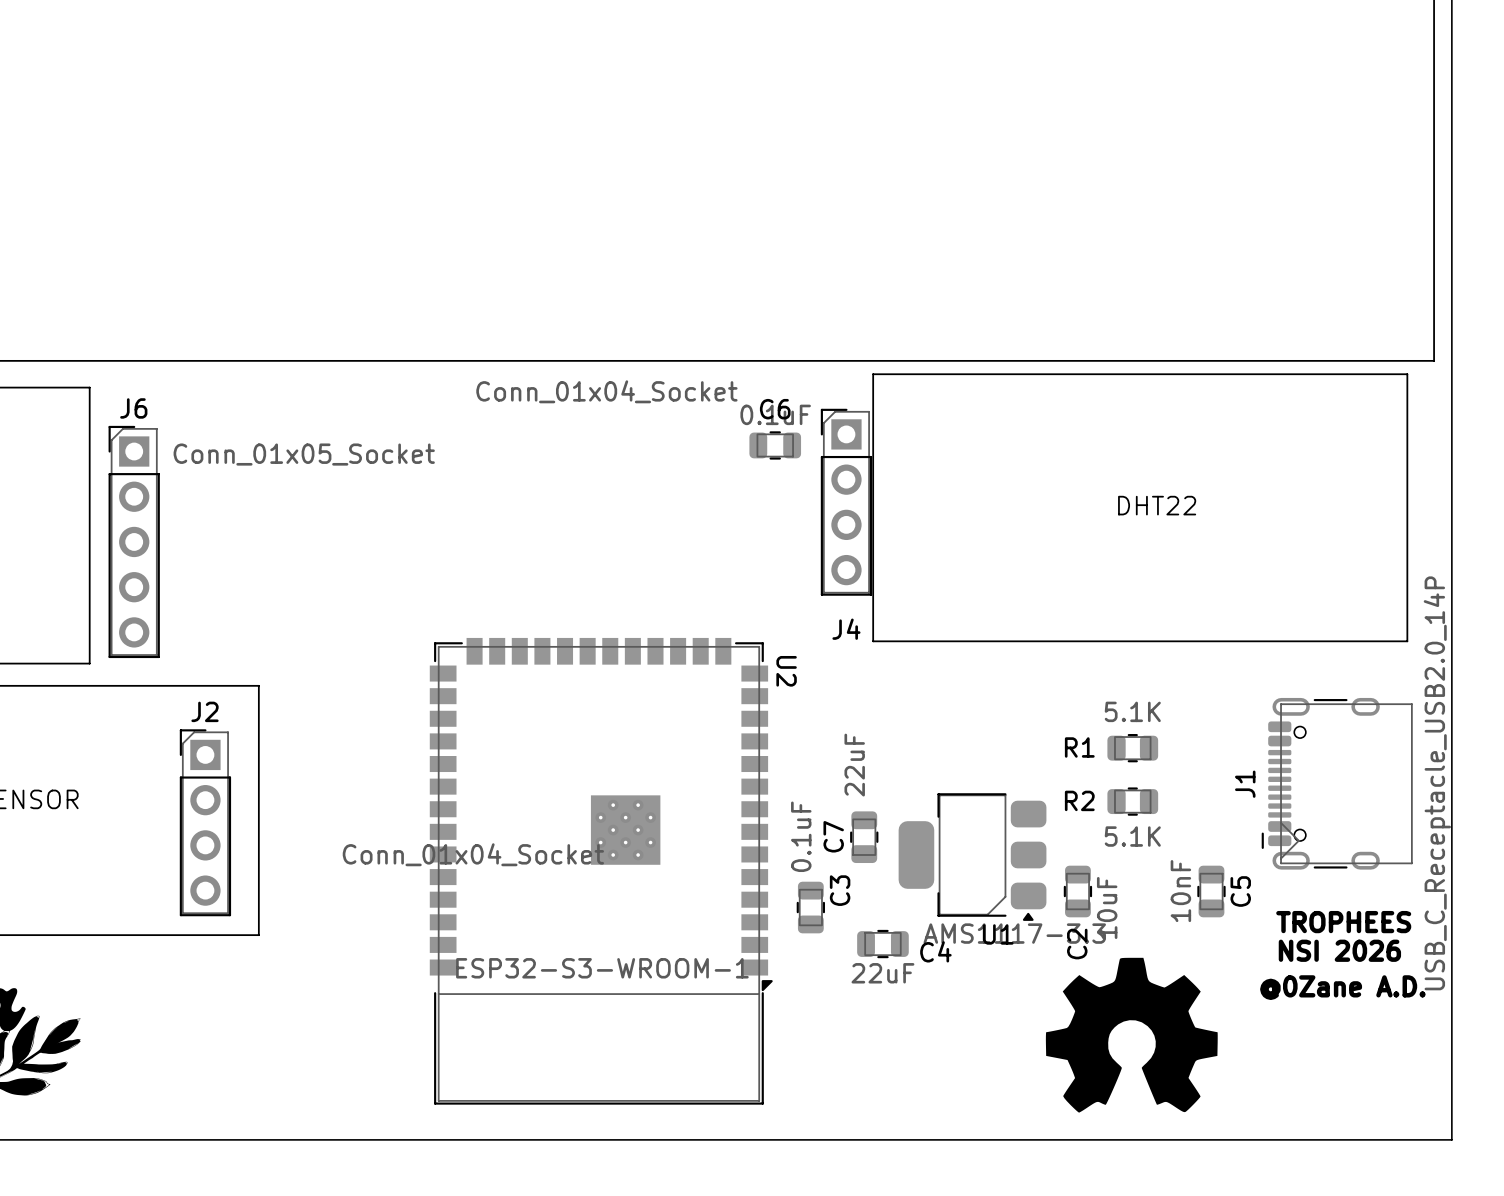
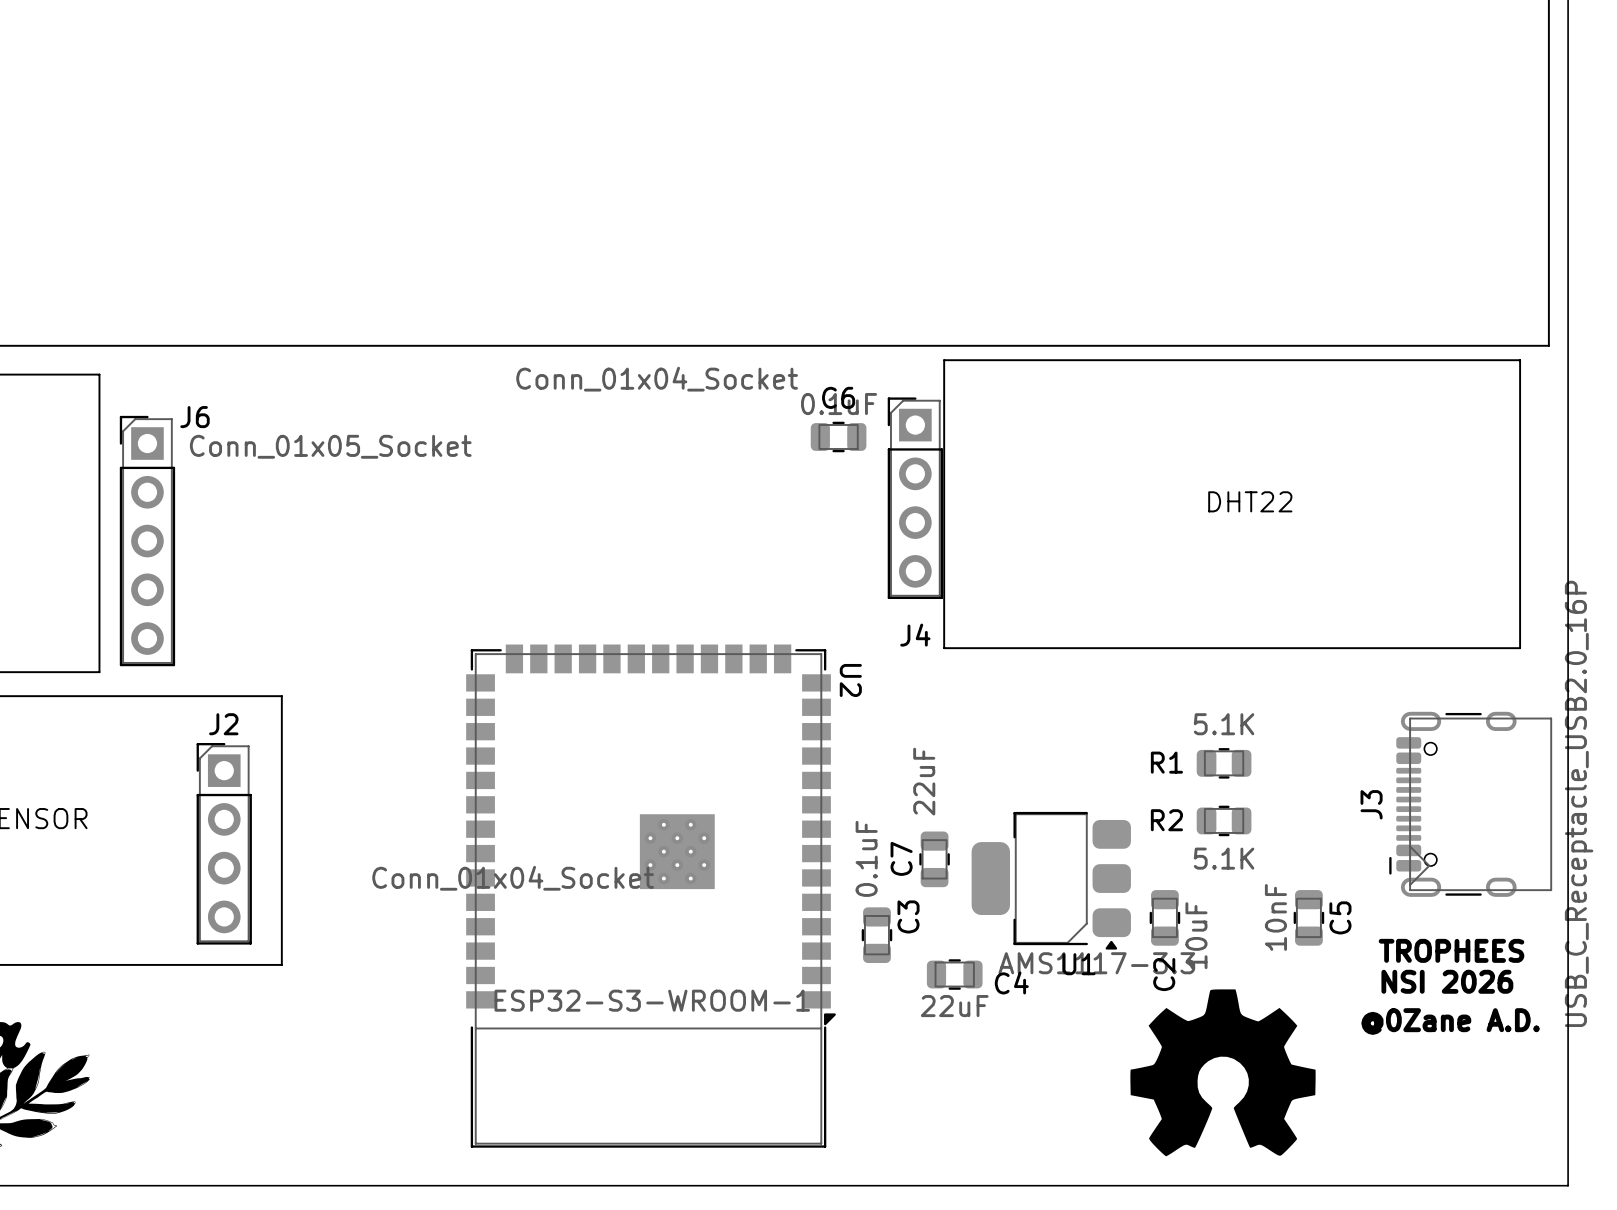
J6 name position: J6 (133, 408) -> J6 (195, 417)
J1: USB_C_Receptacle_USB2.0_14P (1337, 783) -> none
J3: none -> USB_C_Receptacle_USB2.0_16P (1470, 804)

